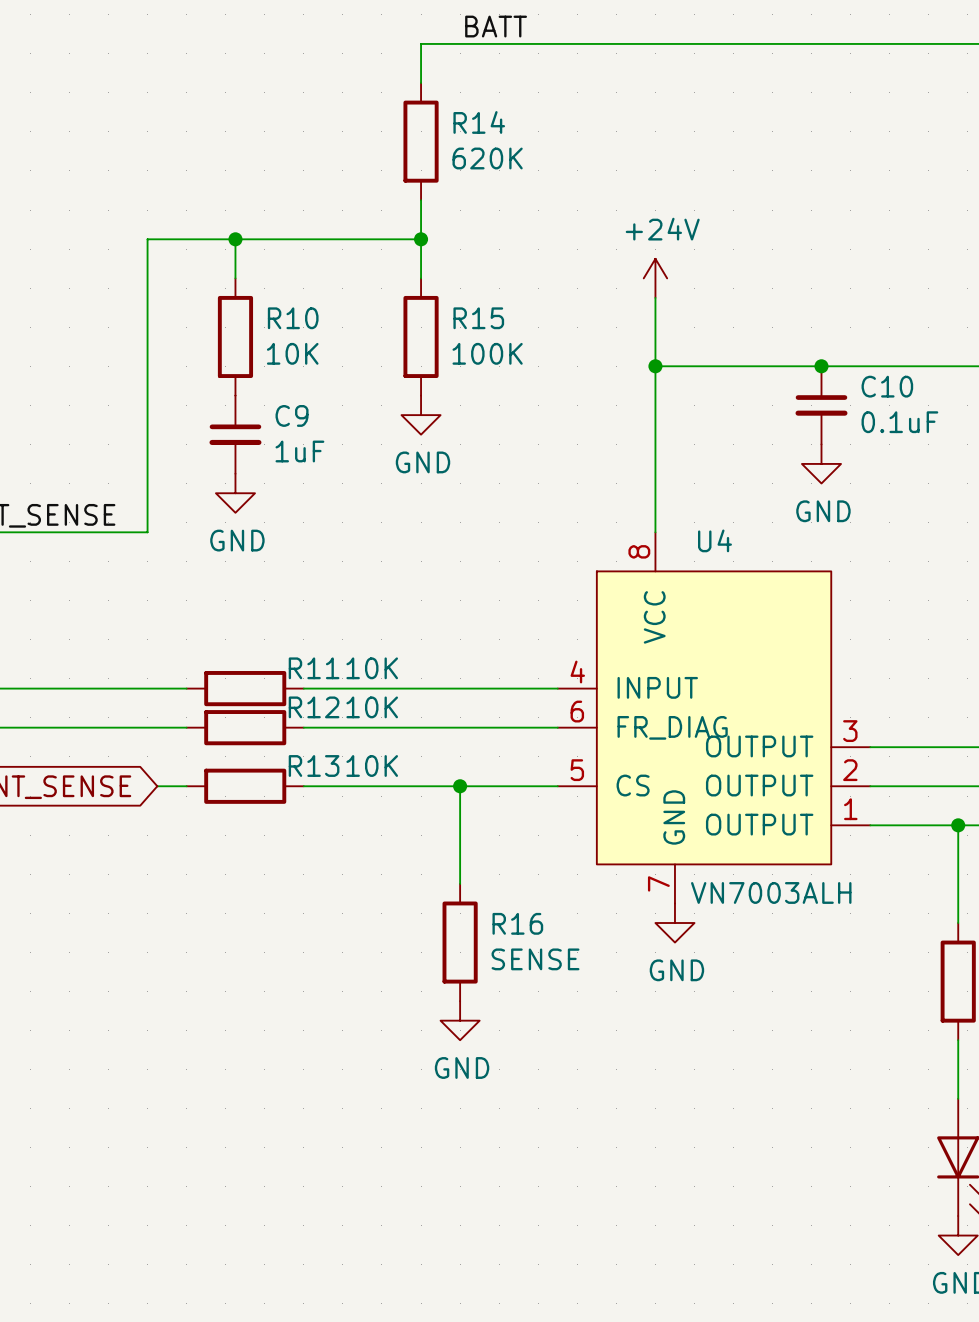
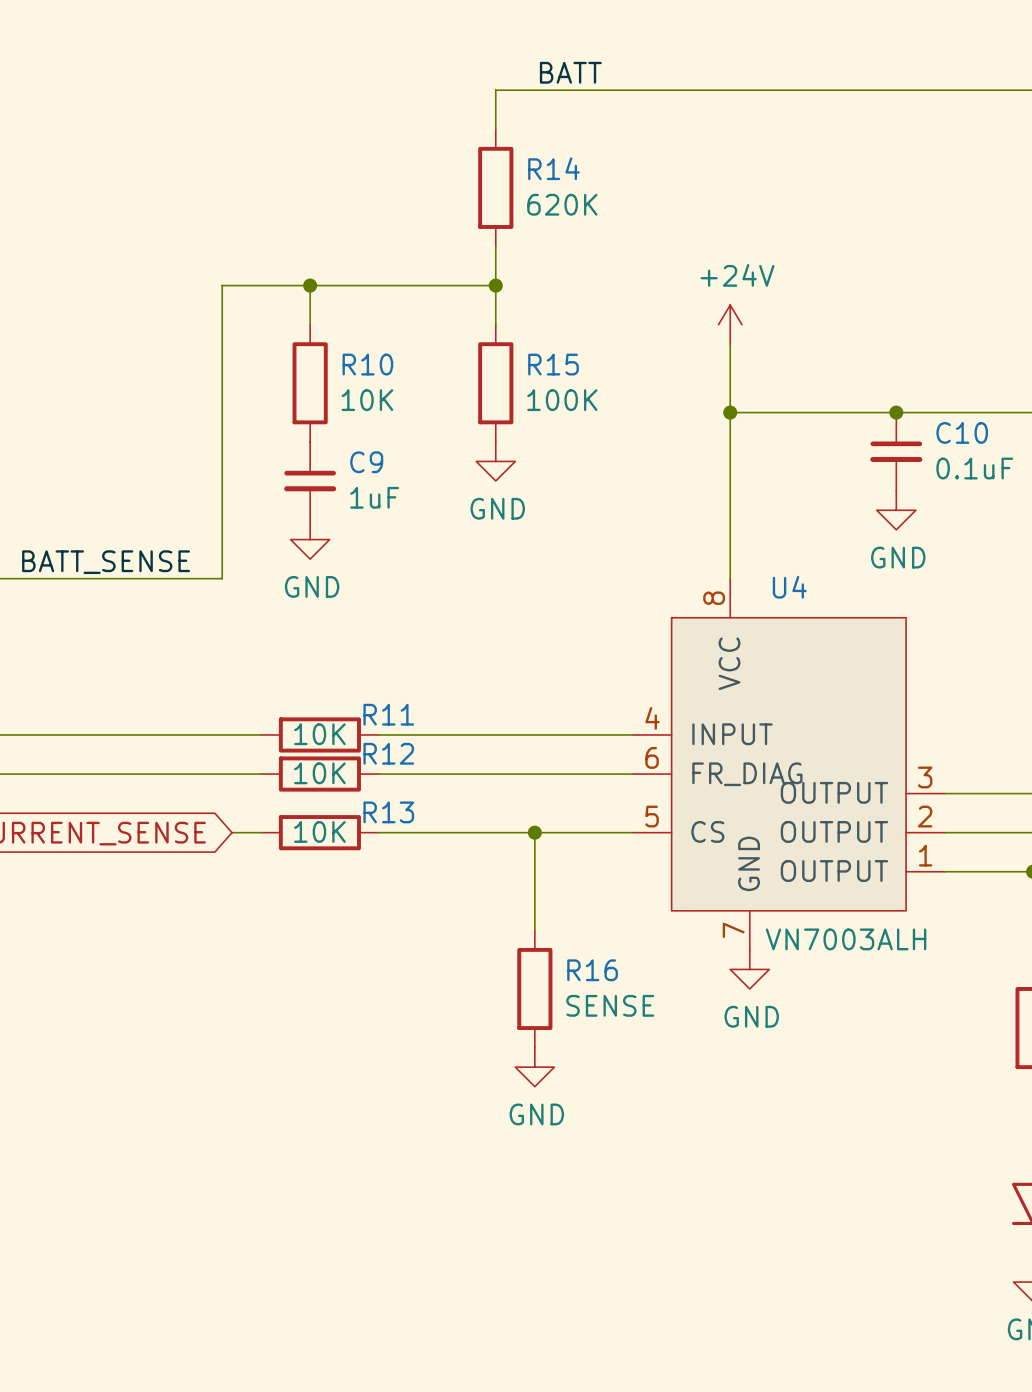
R11 value position: 10K (372, 668) -> 10K (319, 734)
R12 value position: 10K (372, 707) -> 10K (319, 773)
R13 value position: 10K (372, 766) -> 10K (319, 831)

